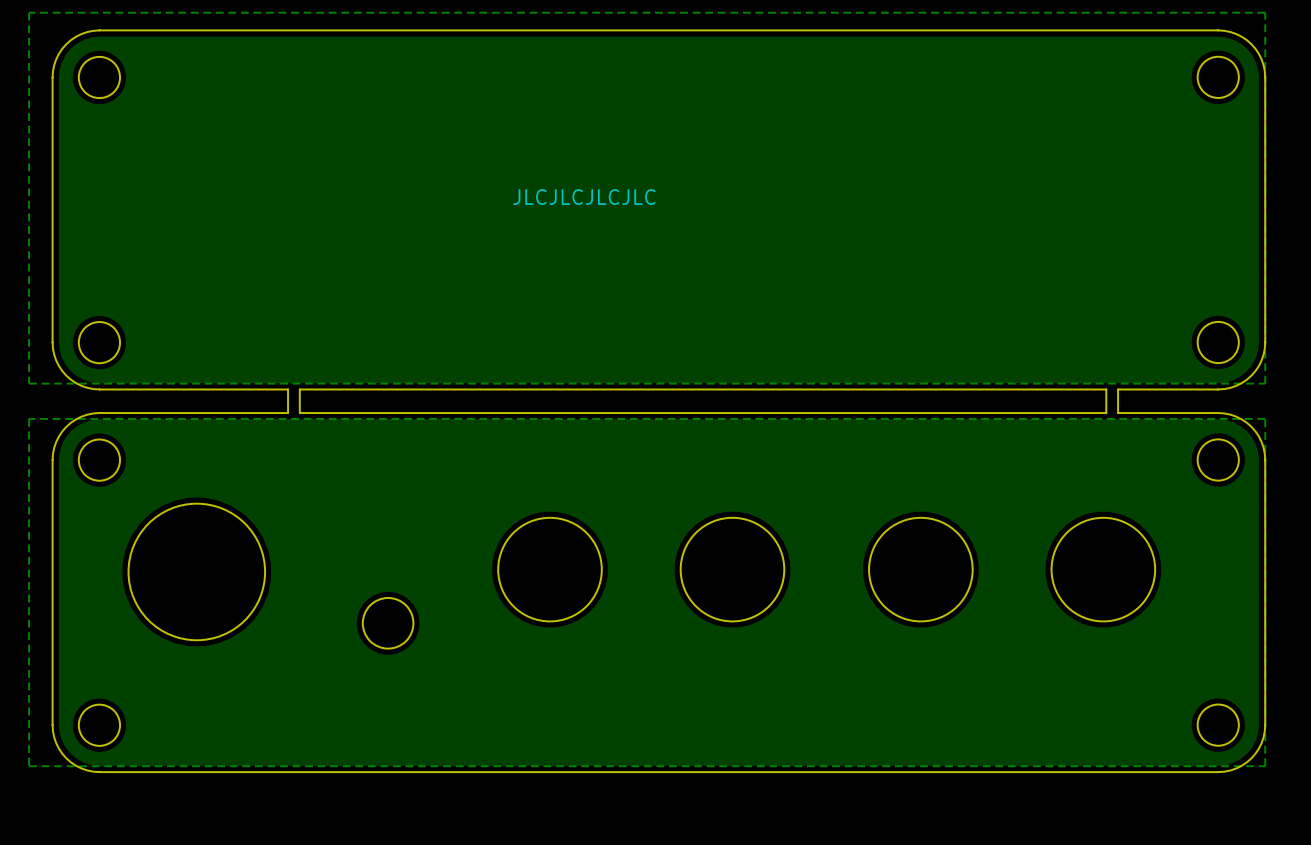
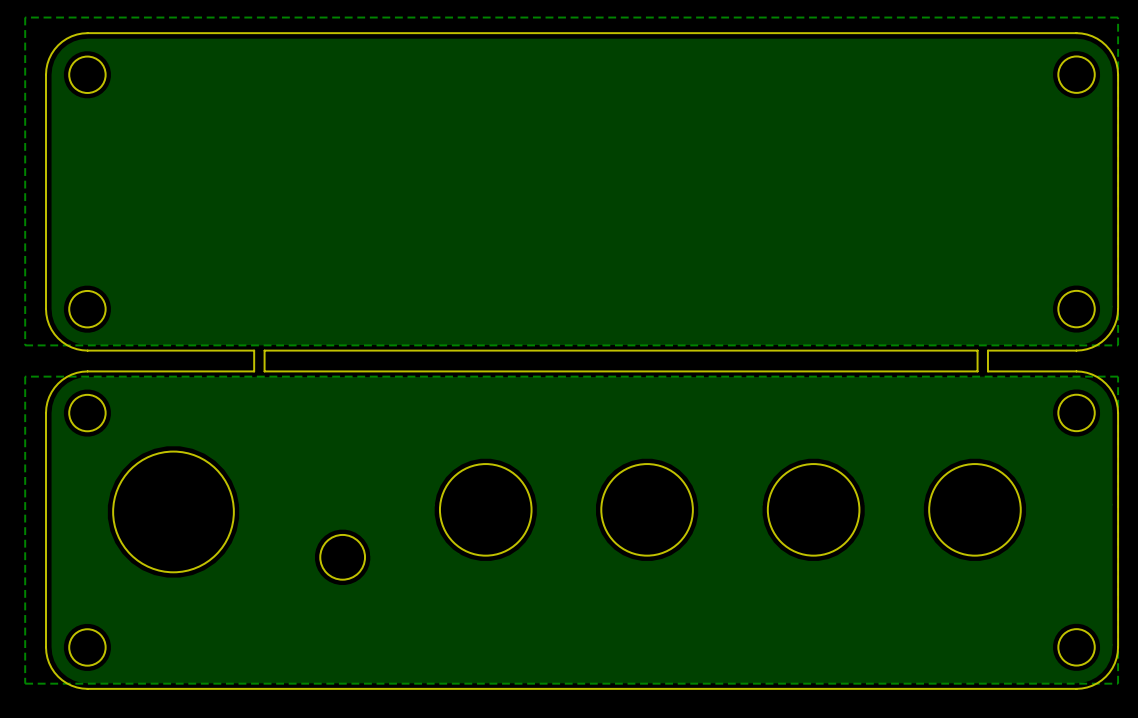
text: JLCJLCJLCJLC (584, 197) -> none

